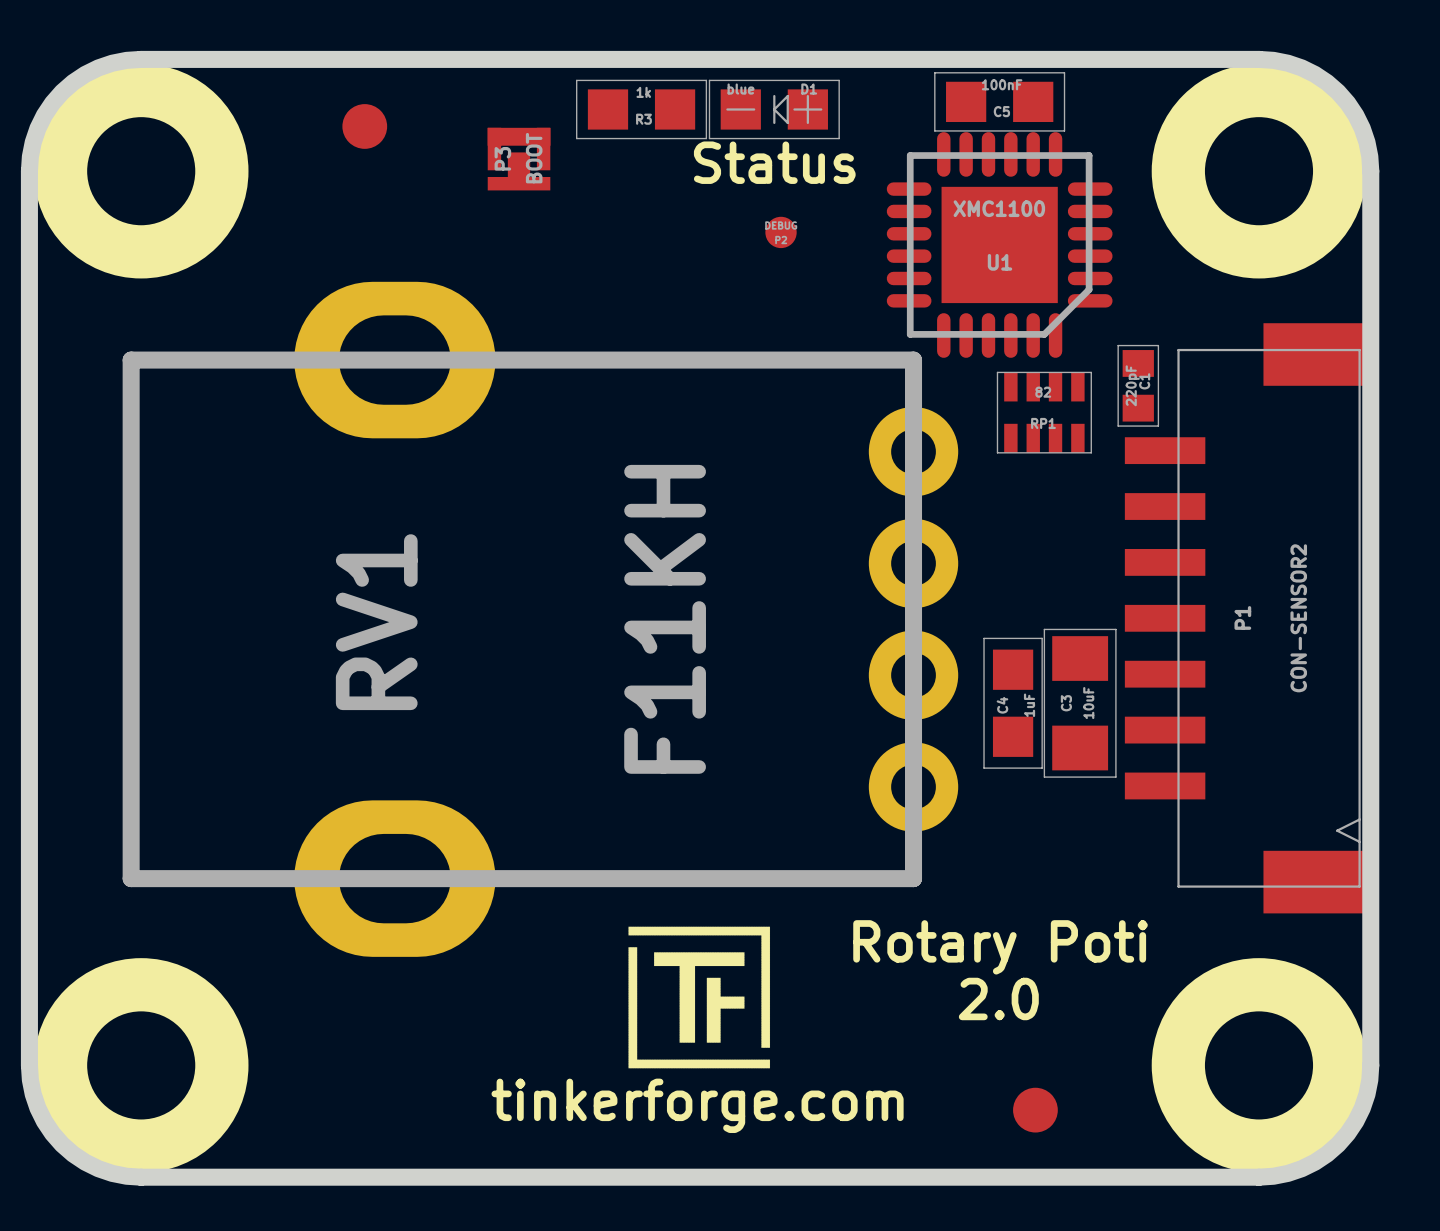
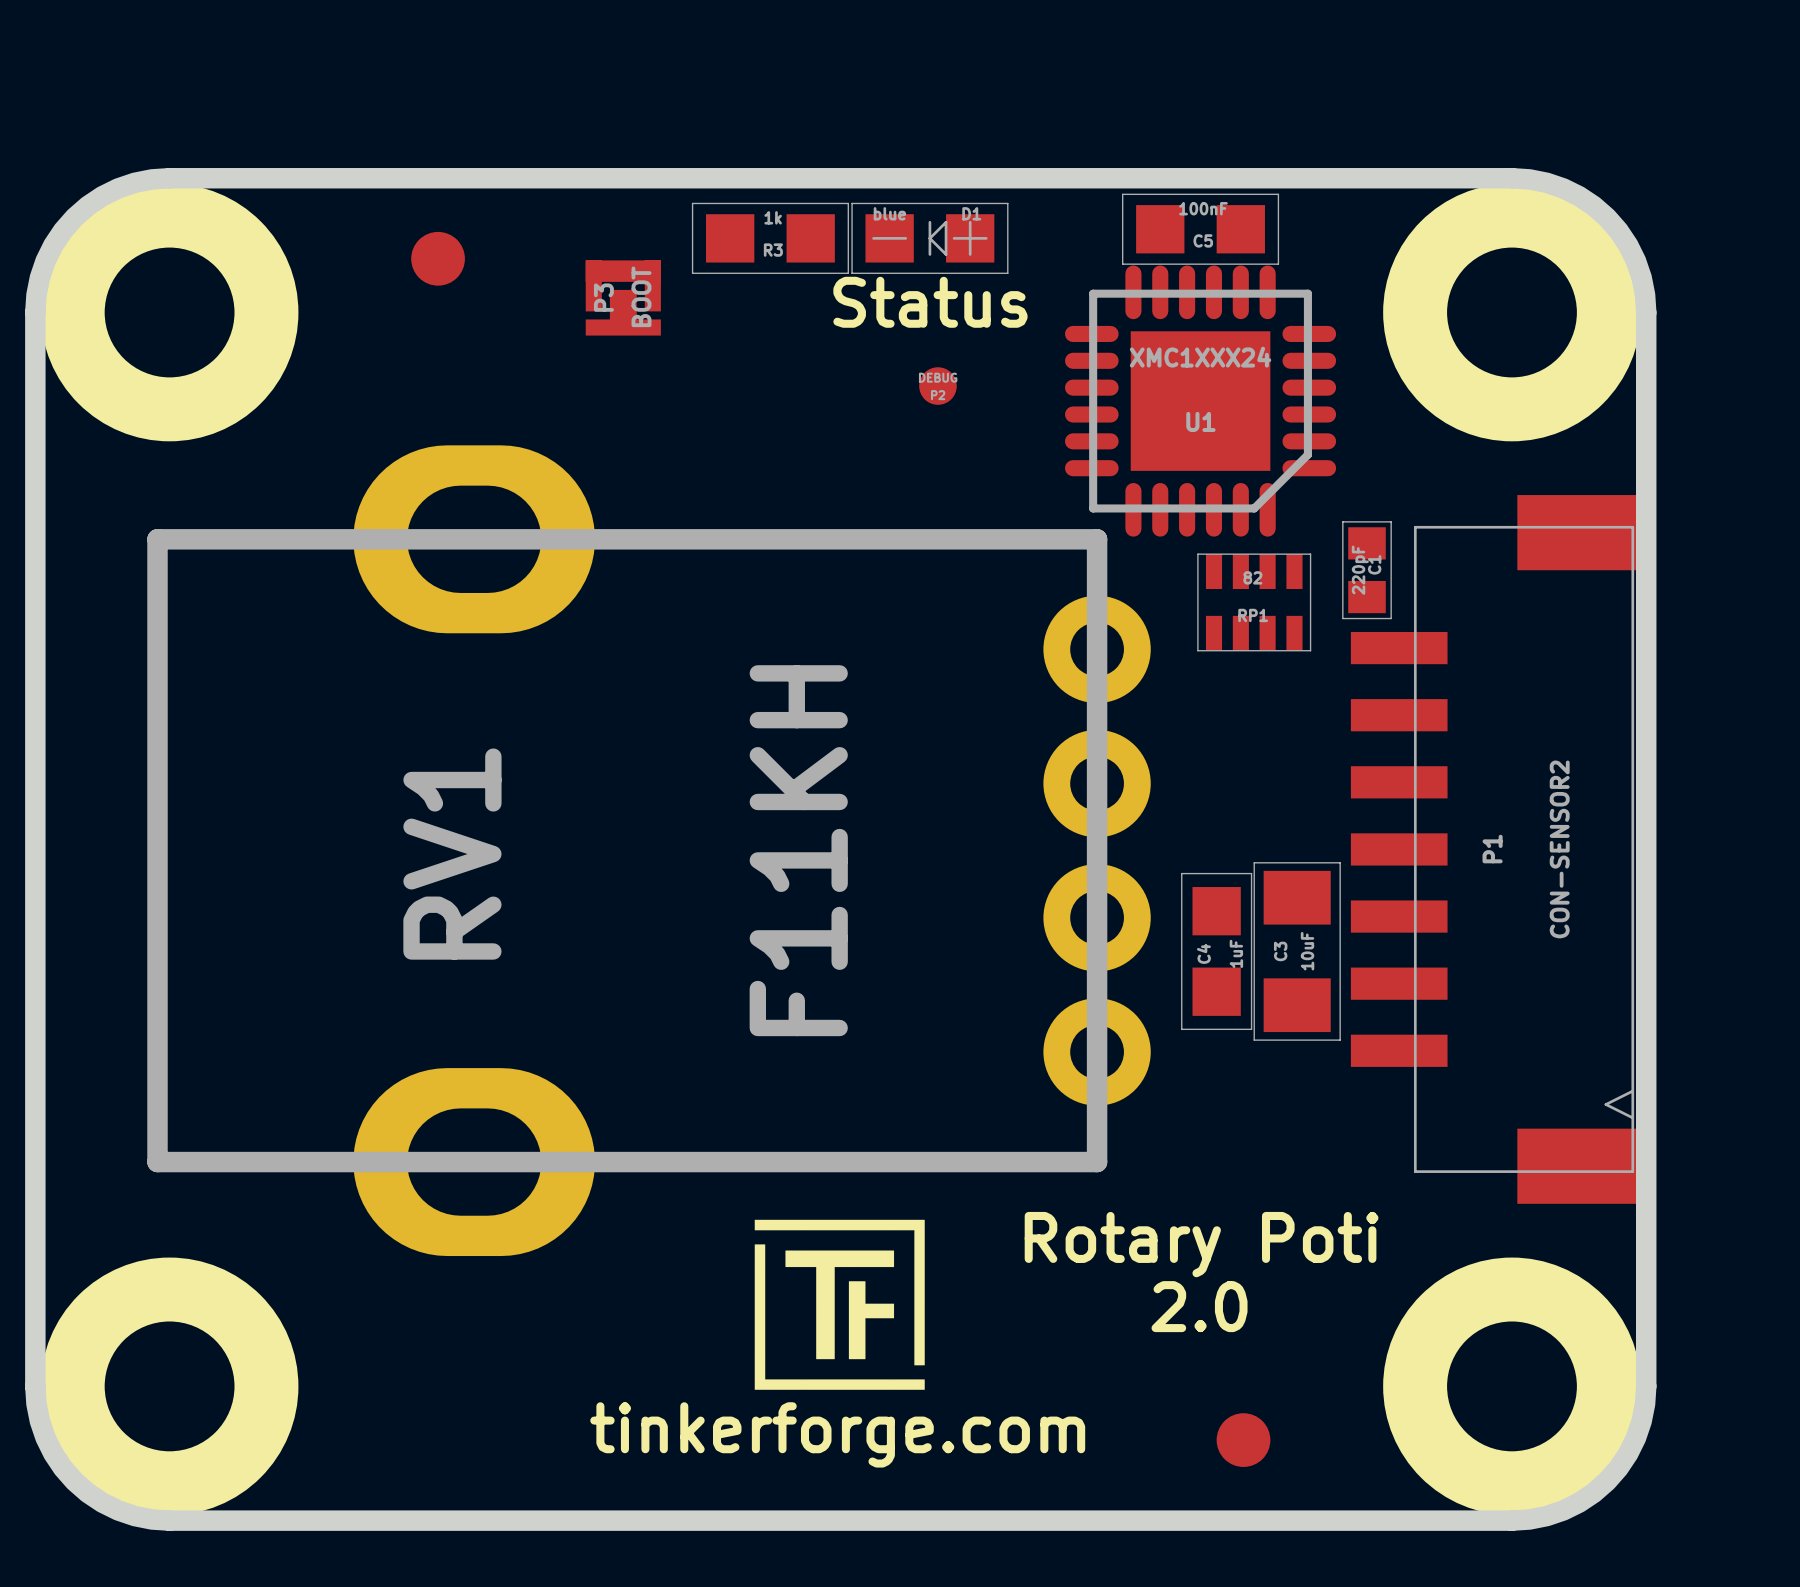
U1 value: XMC1100 (999, 208) -> XMC1XXX24 (1200, 357)

